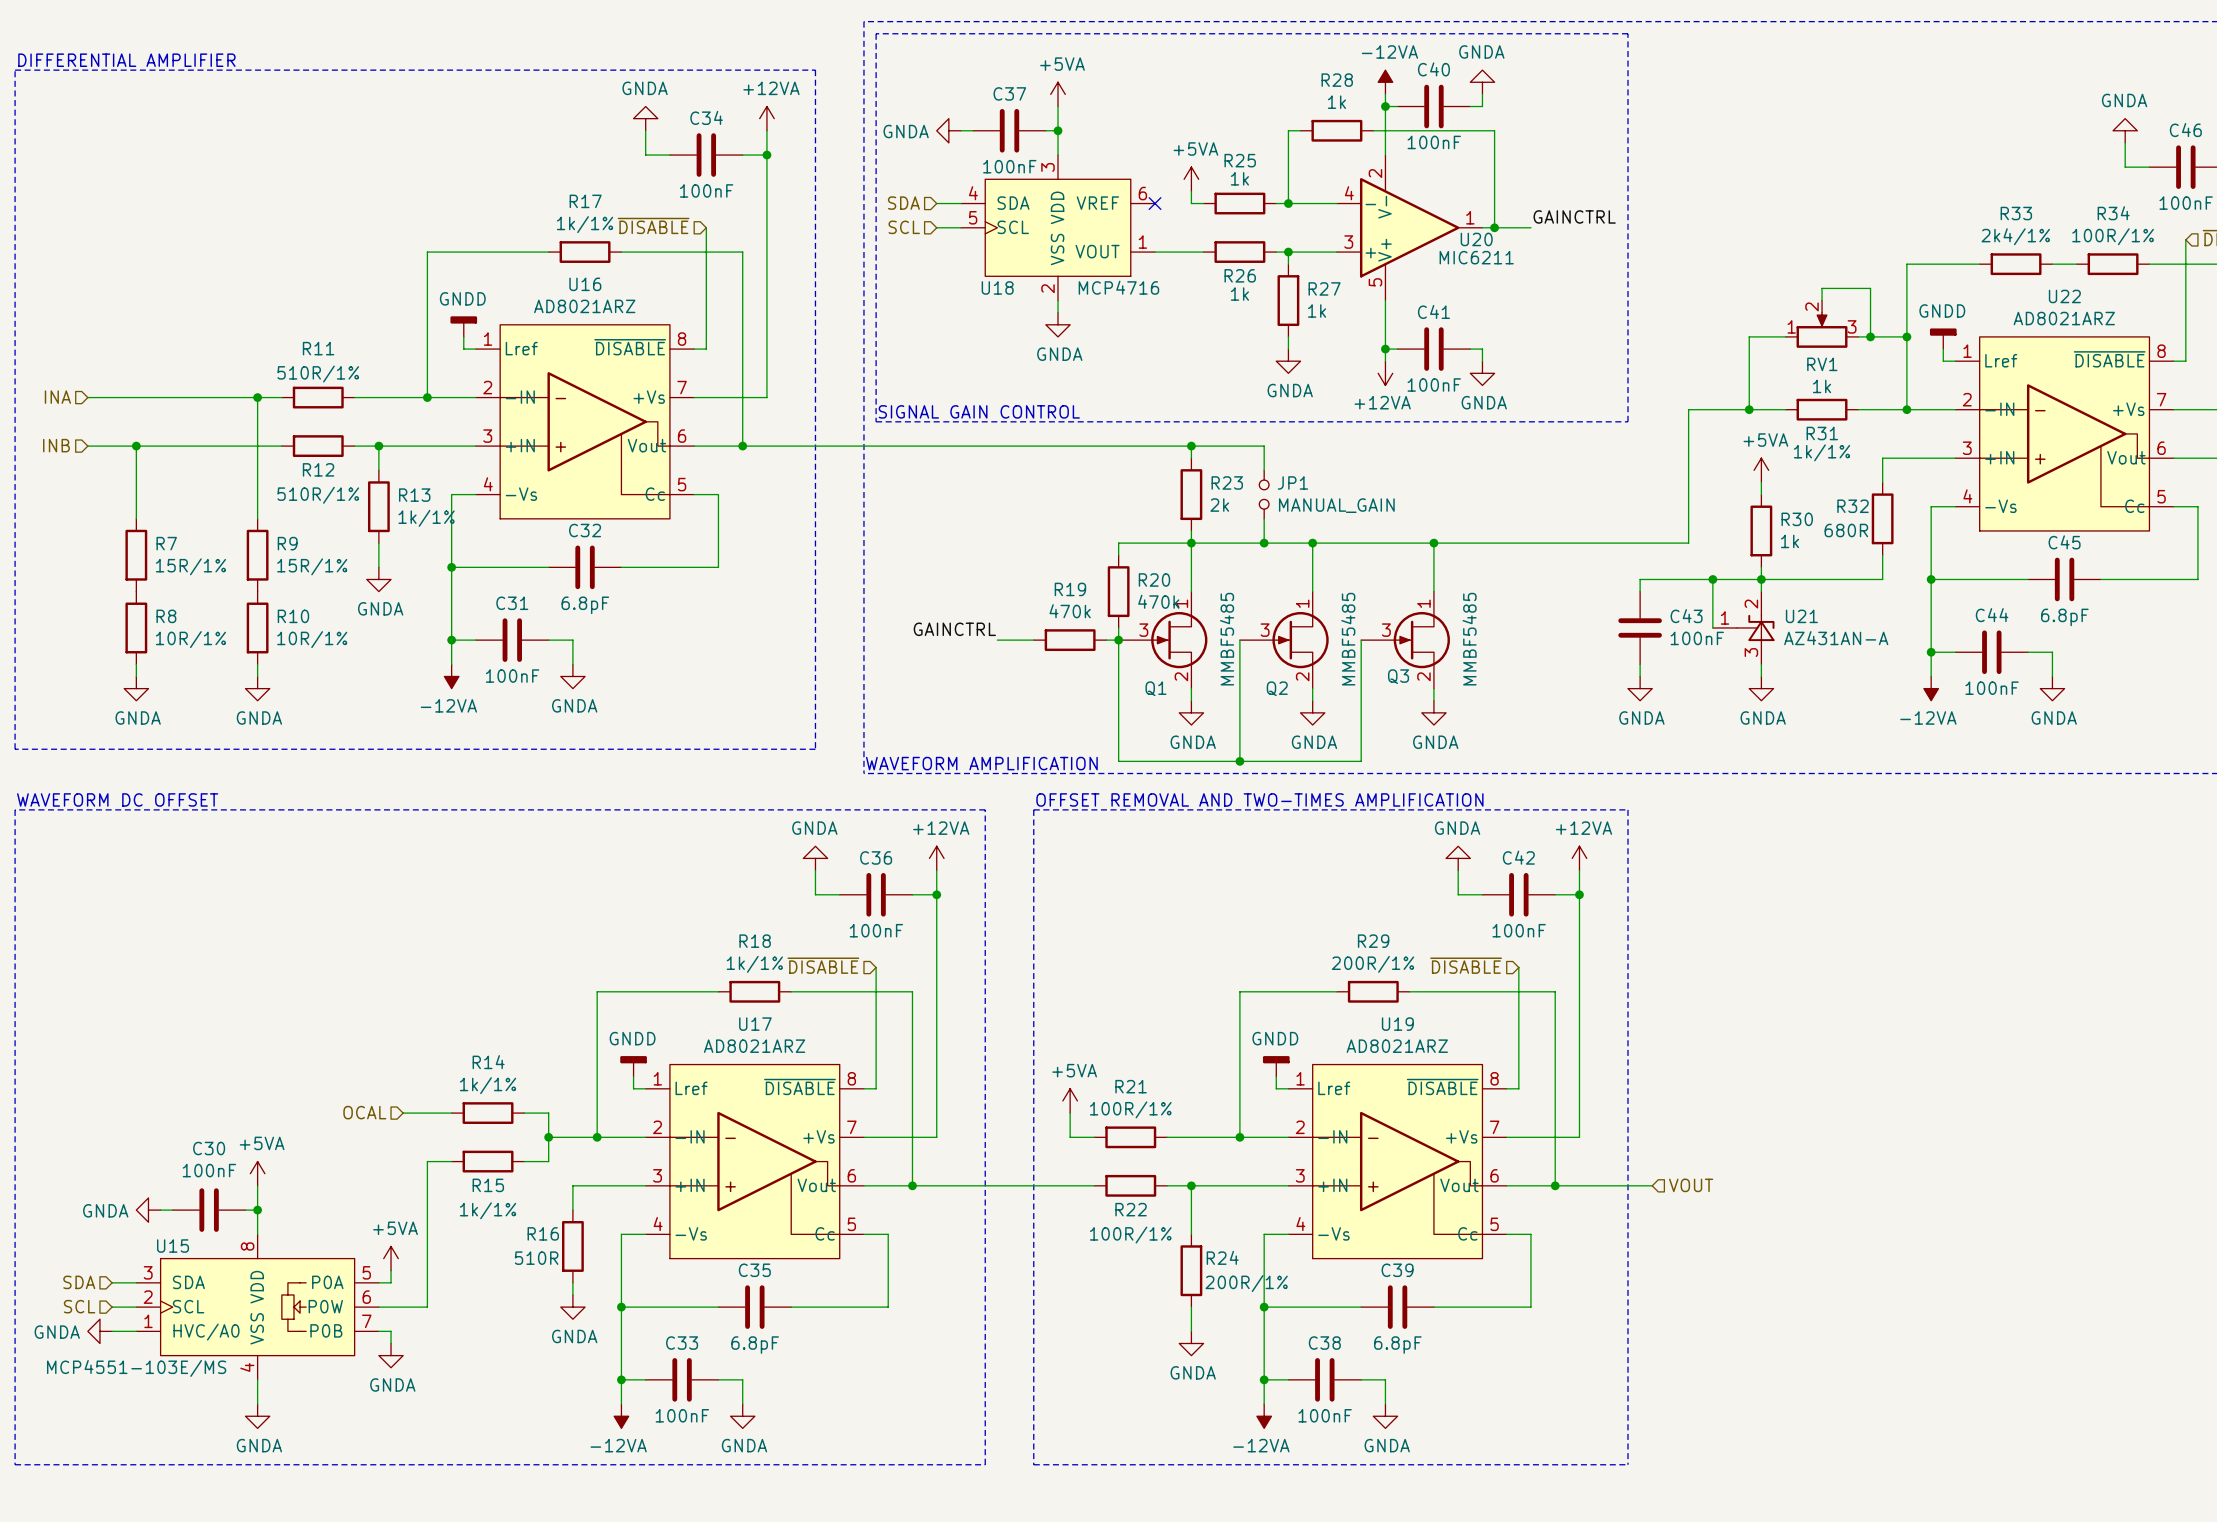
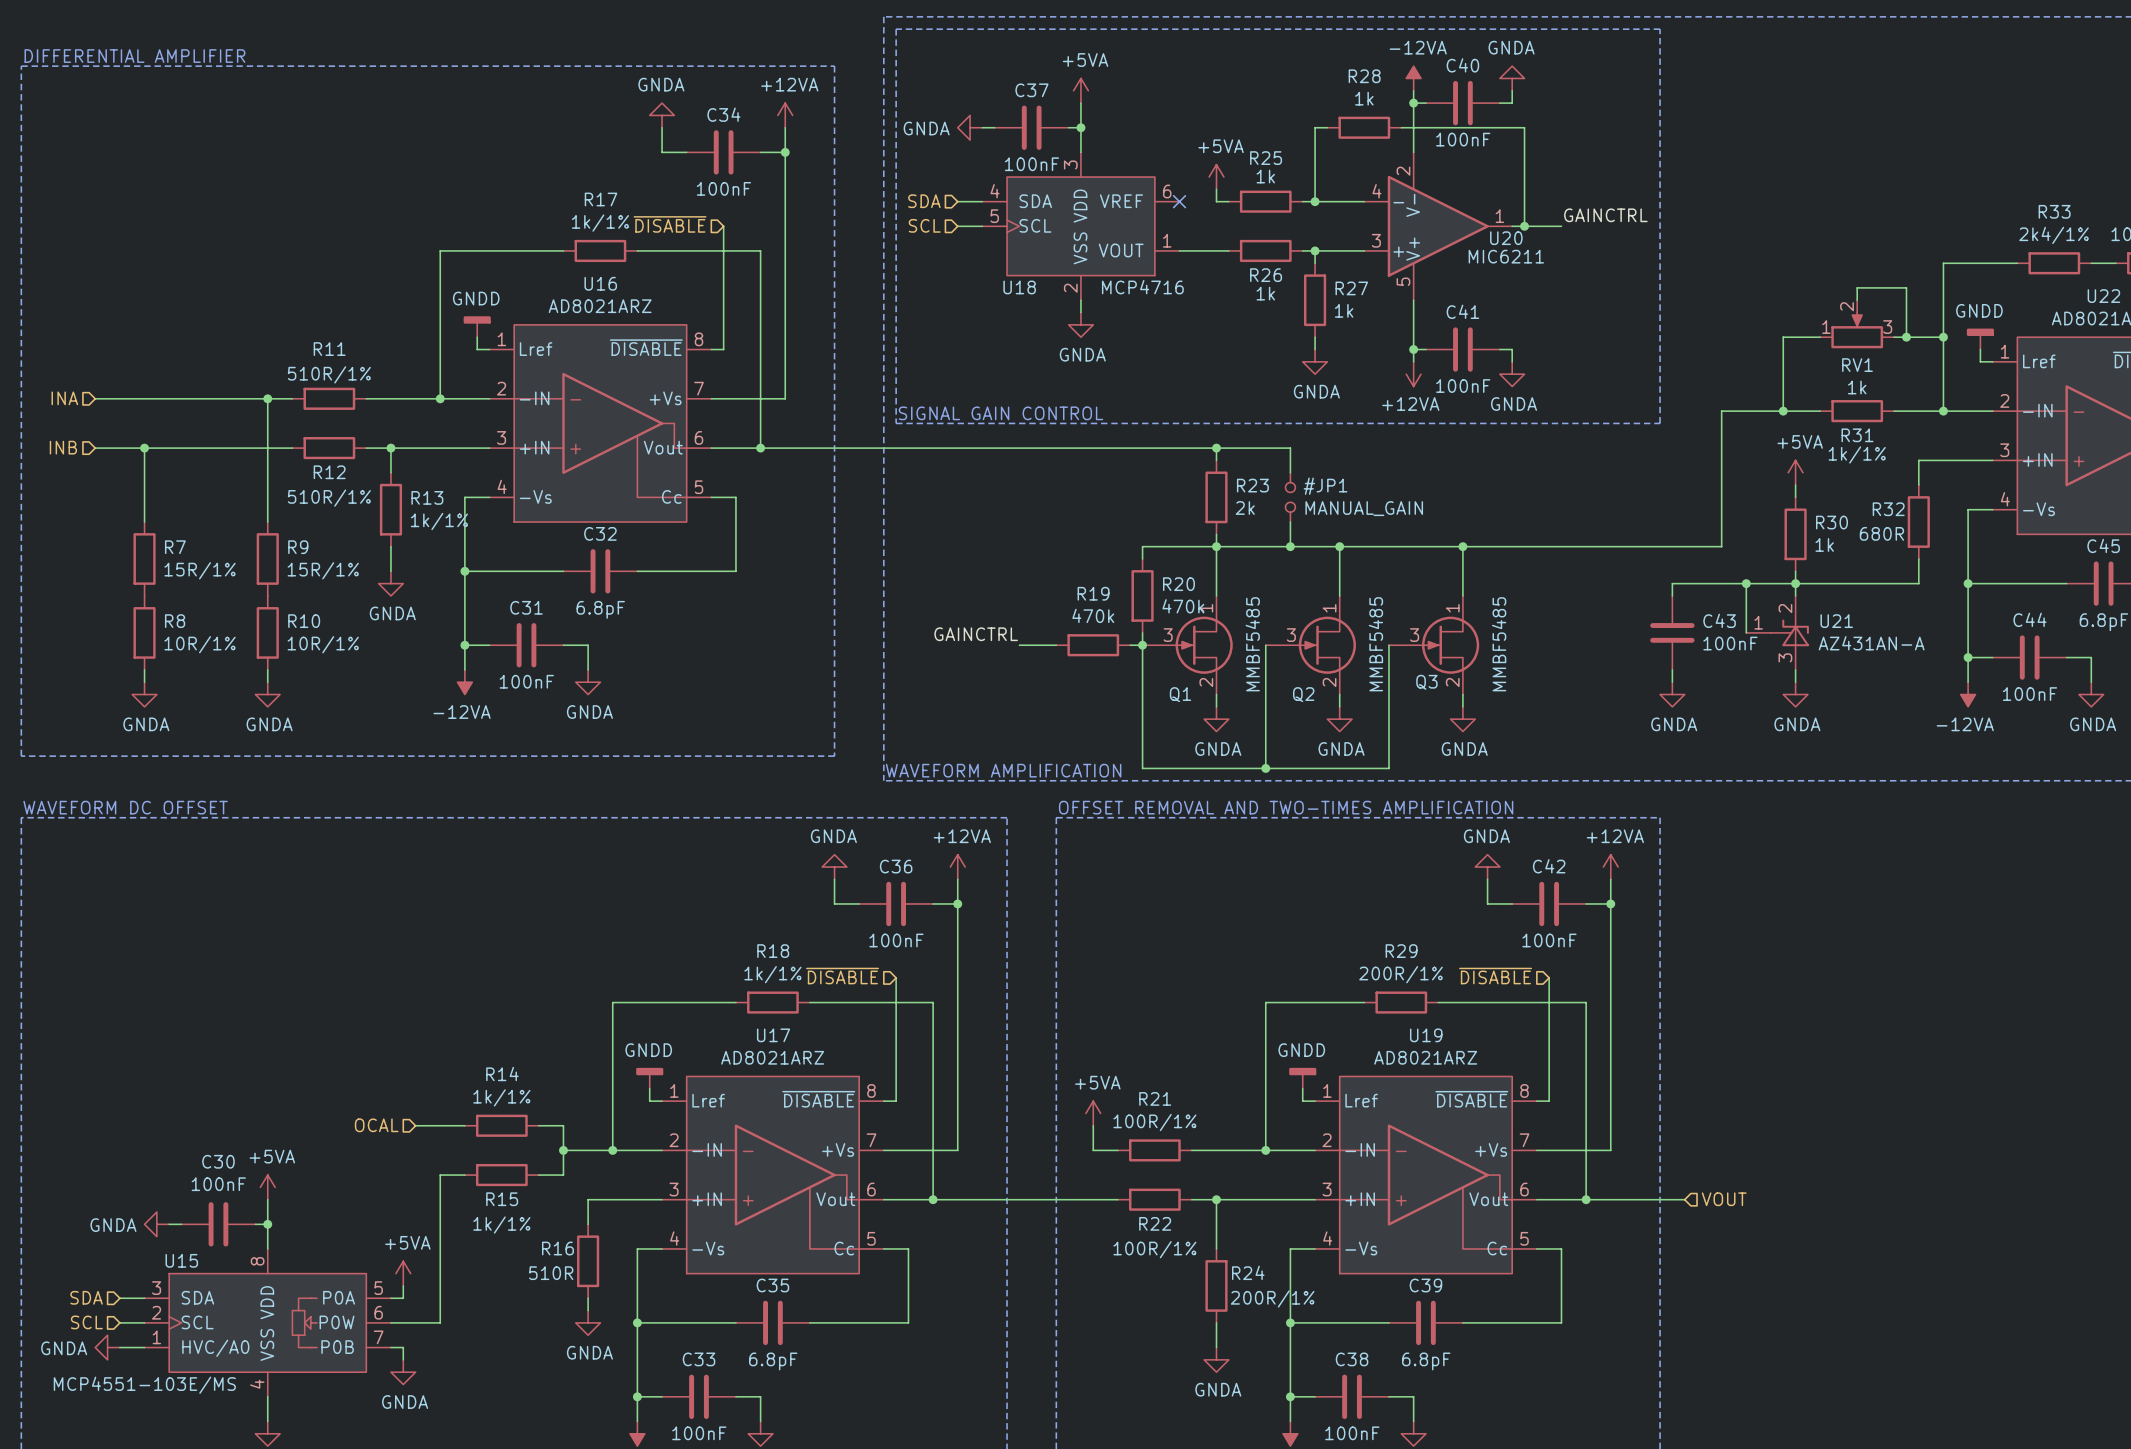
JP1: MANUAL_GAIN (1264, 494) -> none
#JP1: none -> MANUAL_GAIN (1290, 497)

